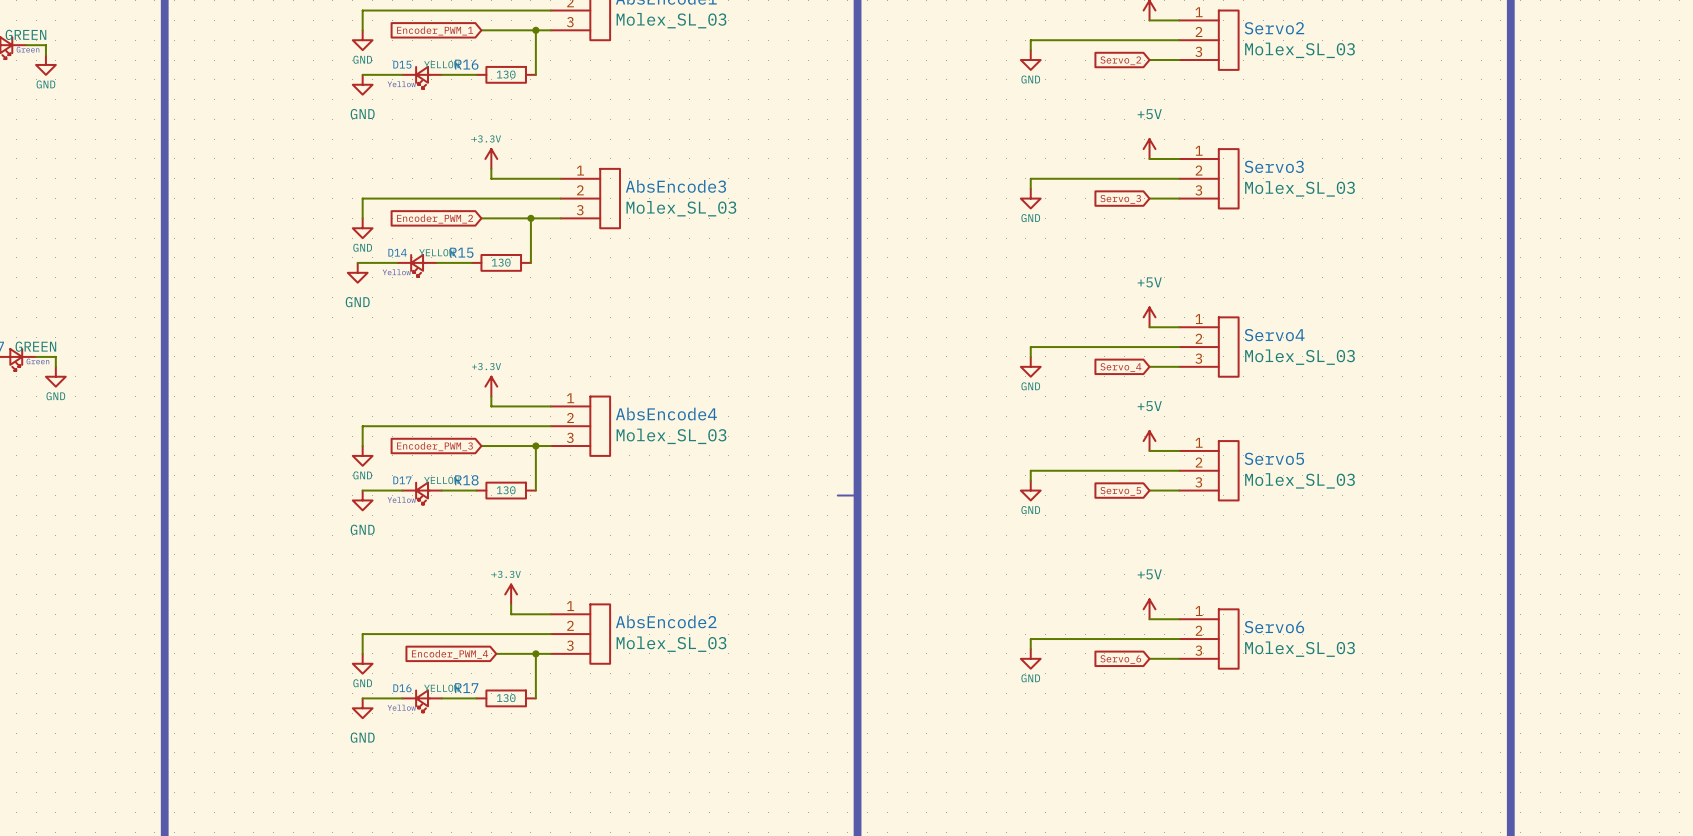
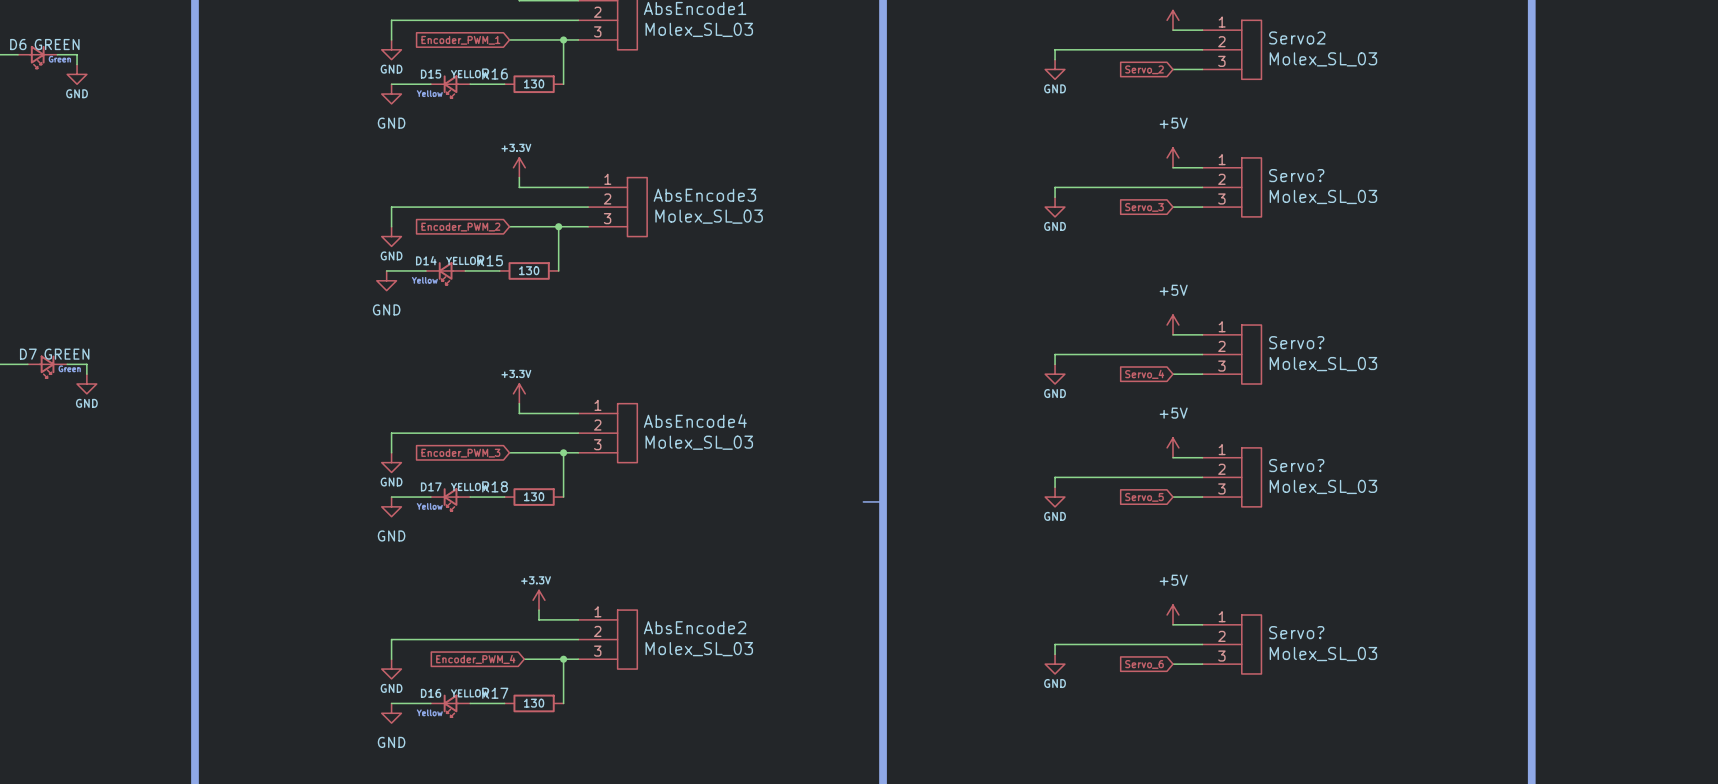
Servo3 name: Servo3 (1274, 166) -> Servo? (1296, 175)
Servo4 name: Servo4 (1274, 335) -> Servo? (1296, 342)
Servo5 name: Servo5 (1274, 458) -> Servo? (1296, 465)
Servo6 name: Servo6 (1274, 627) -> Servo? (1296, 632)

